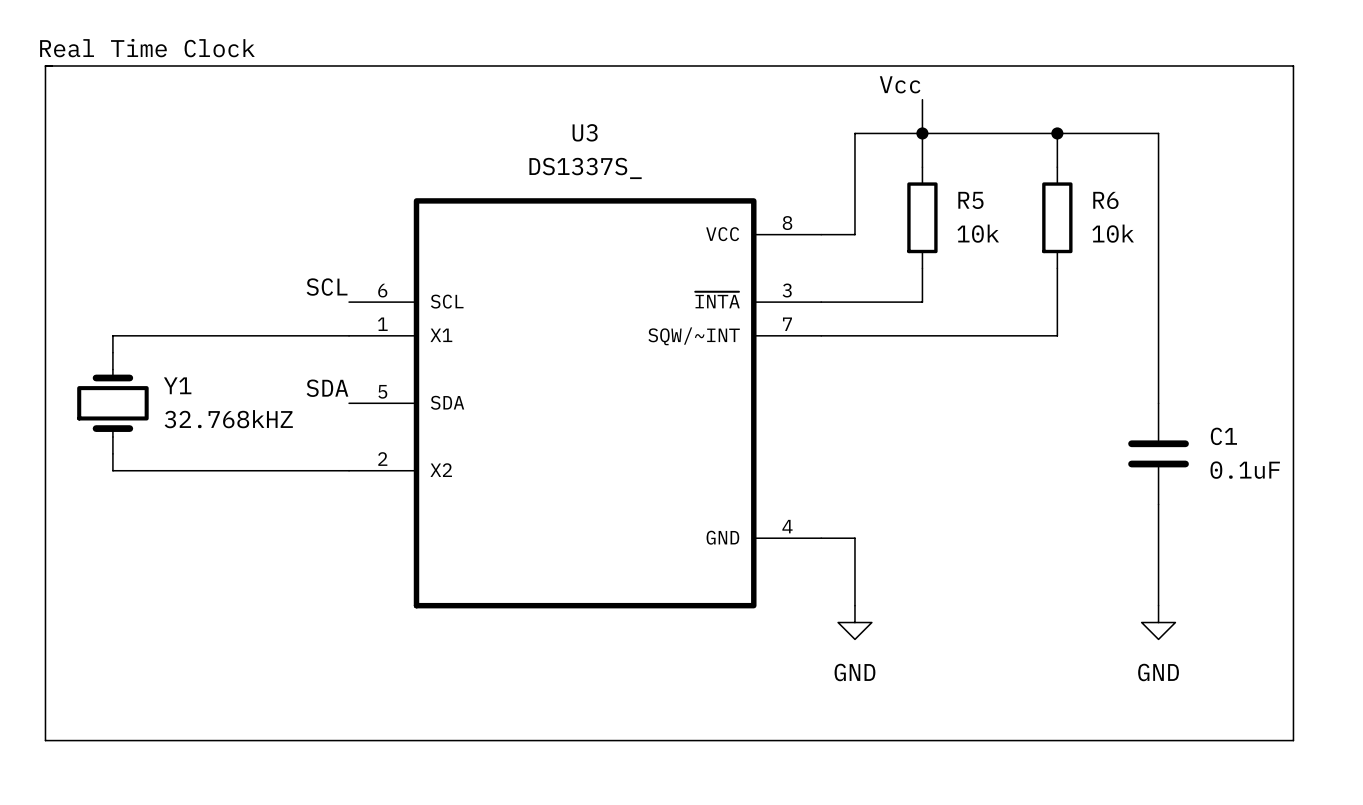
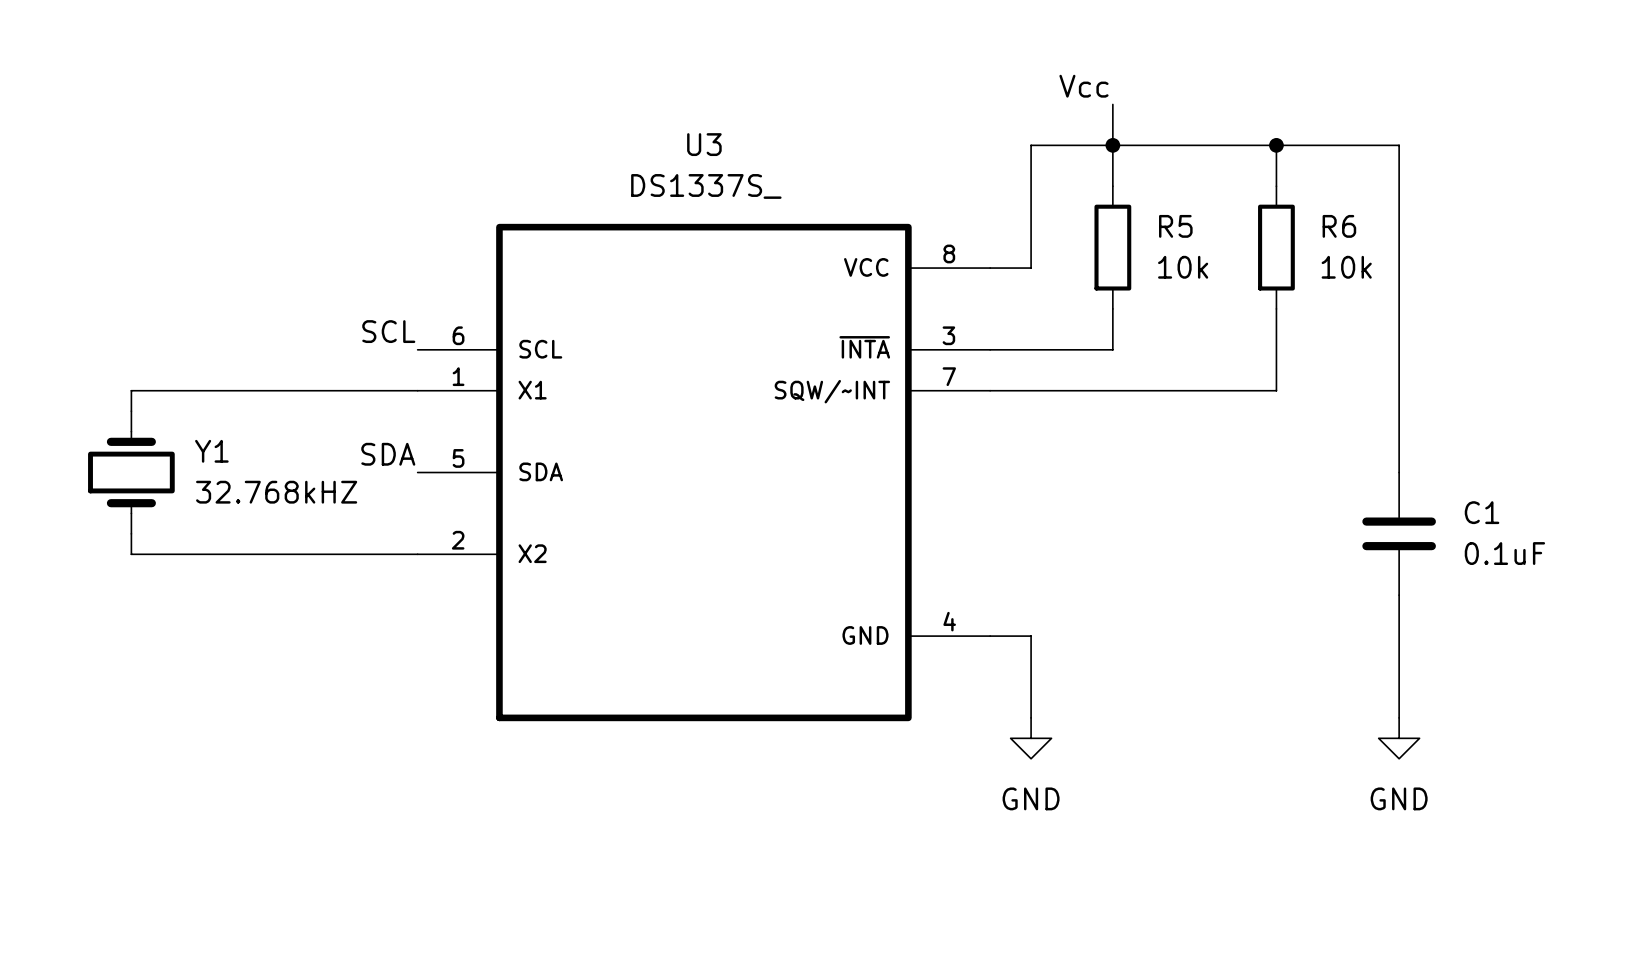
text: Real Time Clock (147, 48) -> none
line: (45, 65) (1293, 65) (1293, 740) (45, 740) (45, 65) -> none

